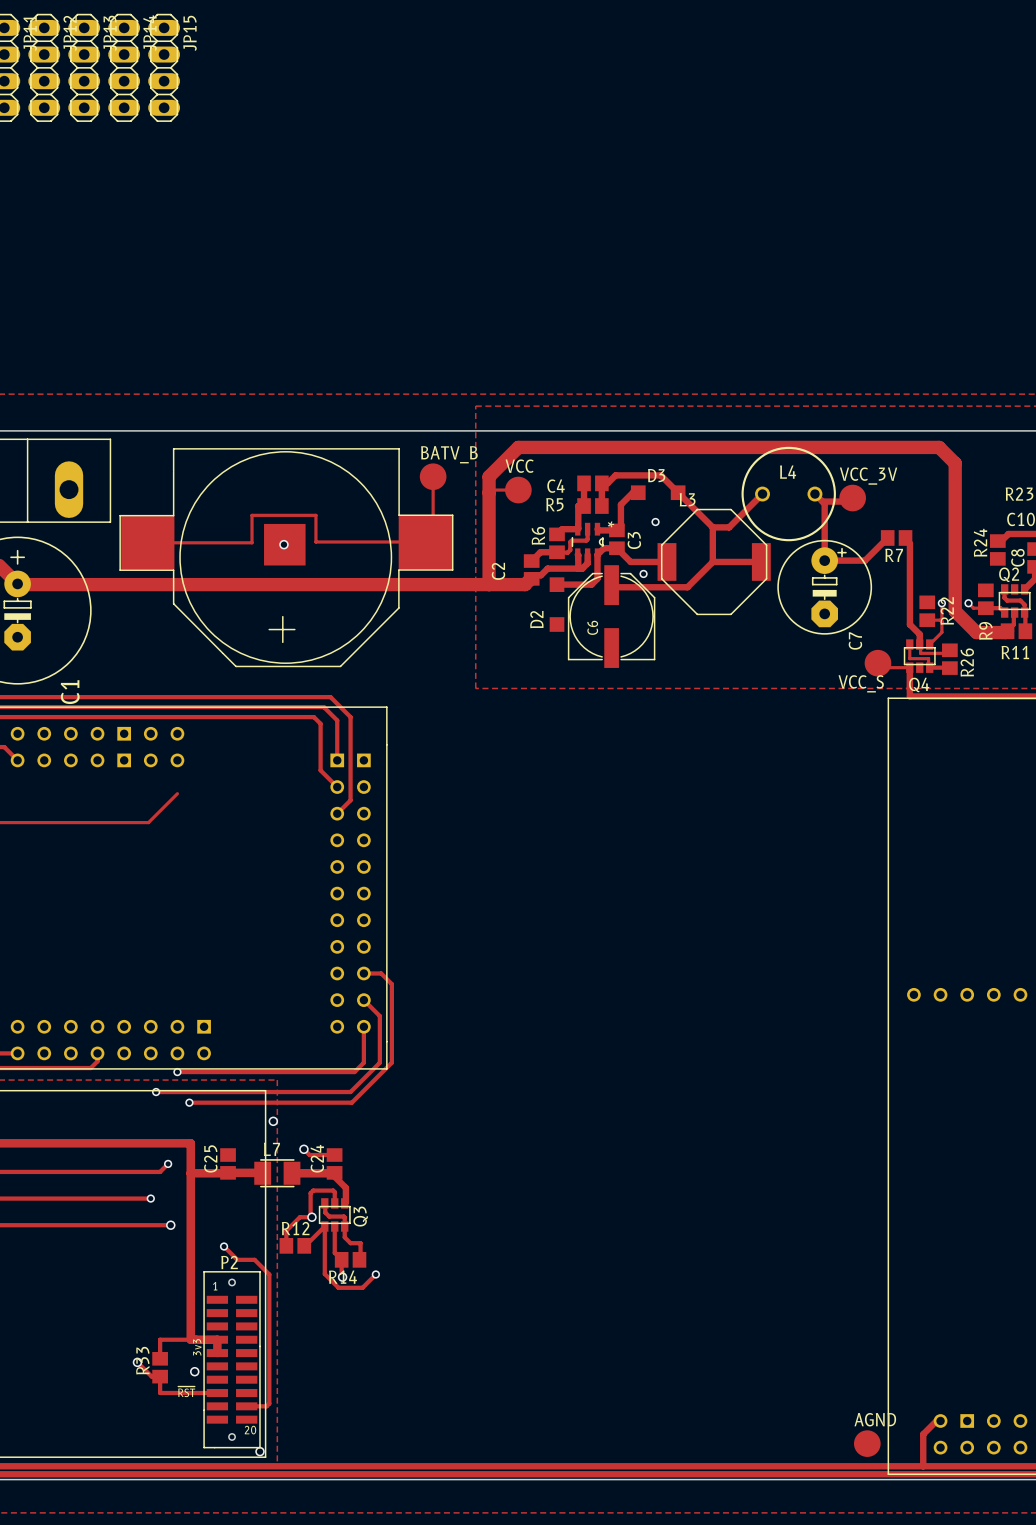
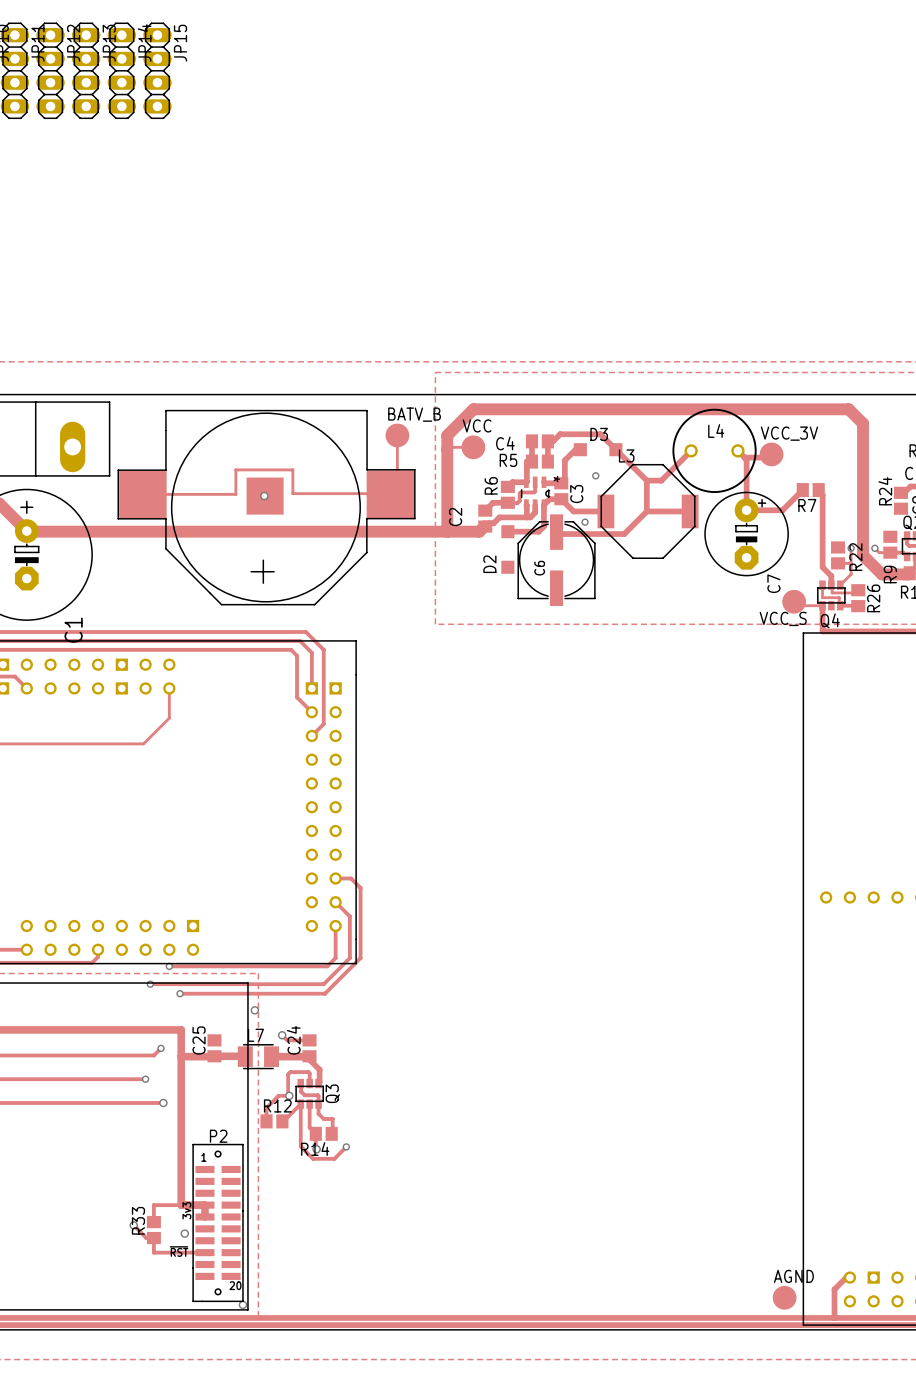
track: none -> (169, 688) (169, 718)
track: (224, 1246) (237, 1259) (254, 1259) (269, 1274) (269, 1403) (266, 1406) (246, 1406) -> none
via: (224, 1246) -> none

